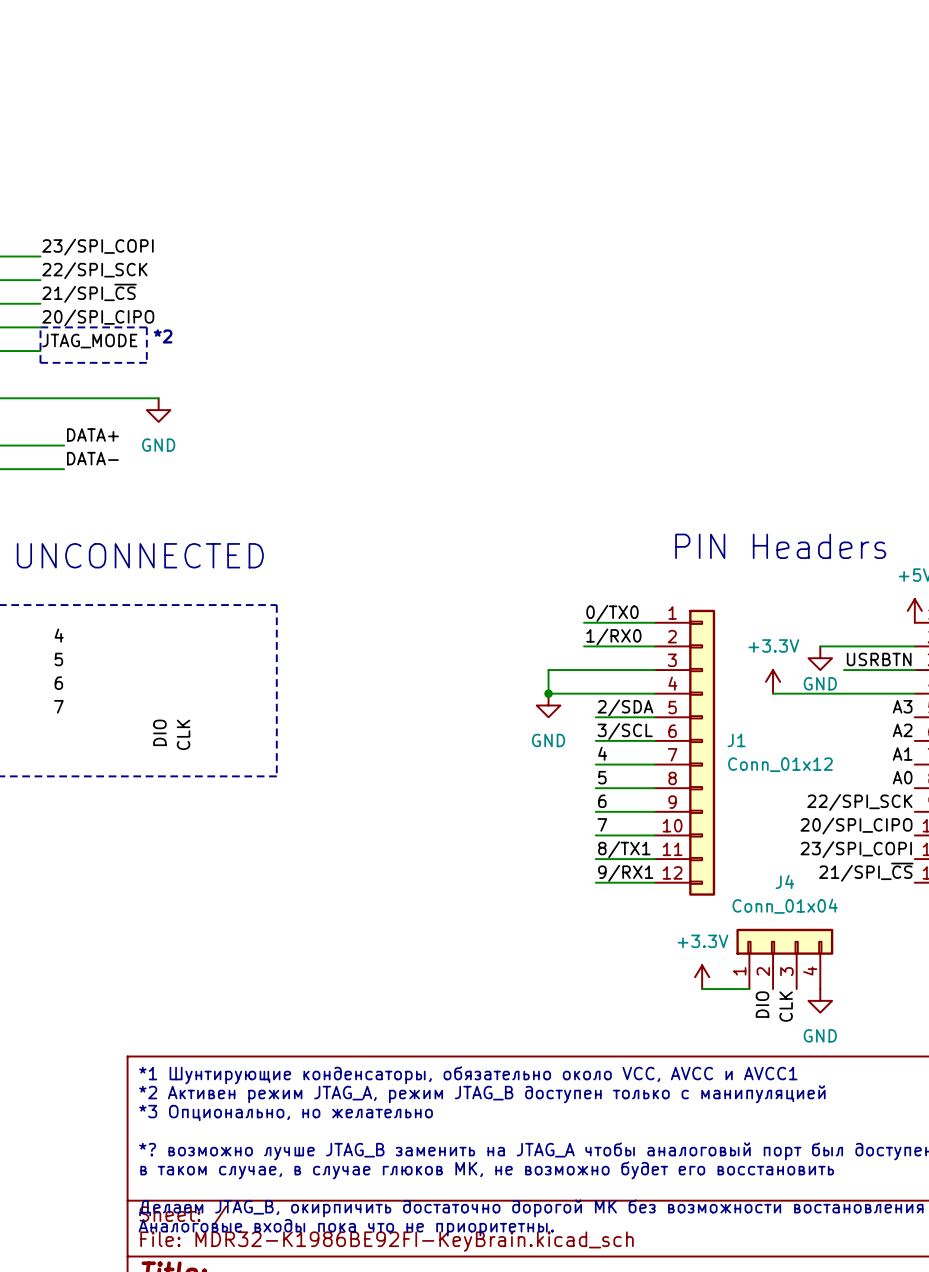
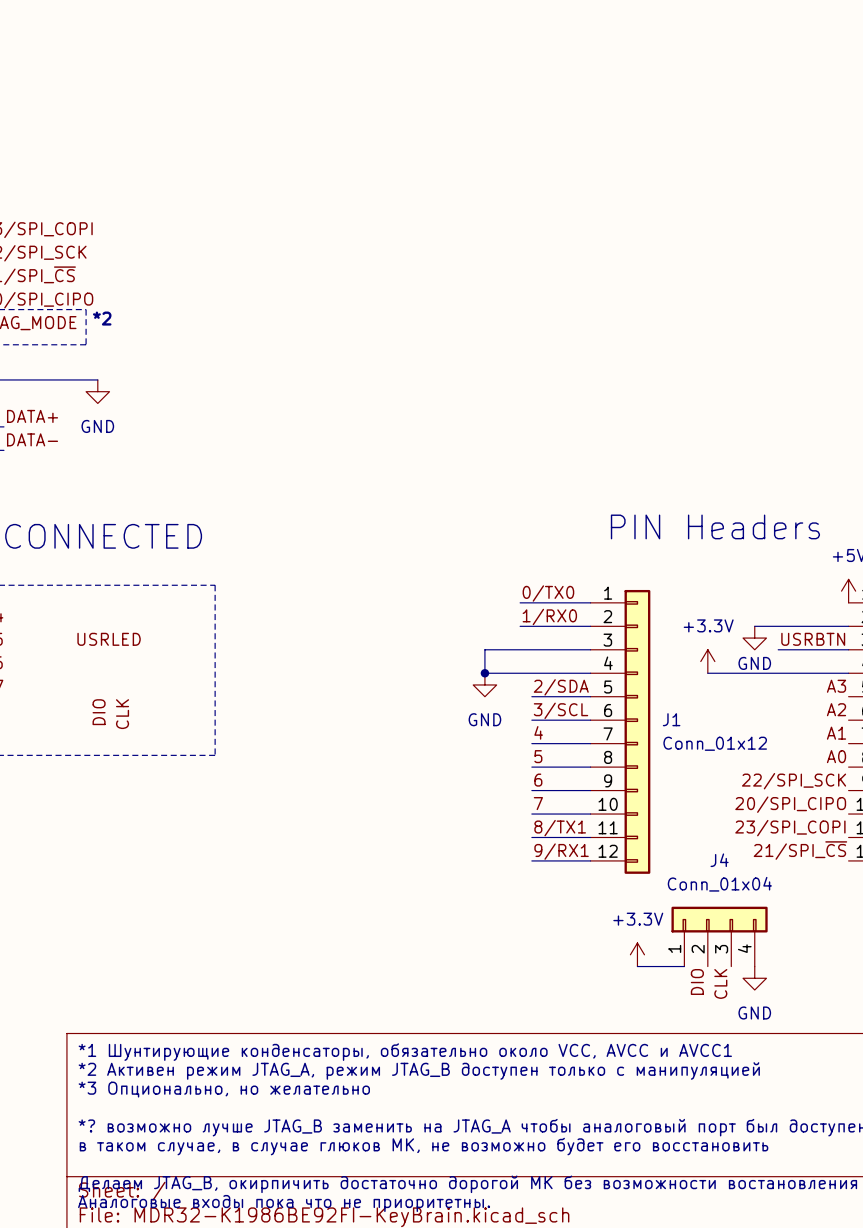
label: none -> USRLED (109, 639)

